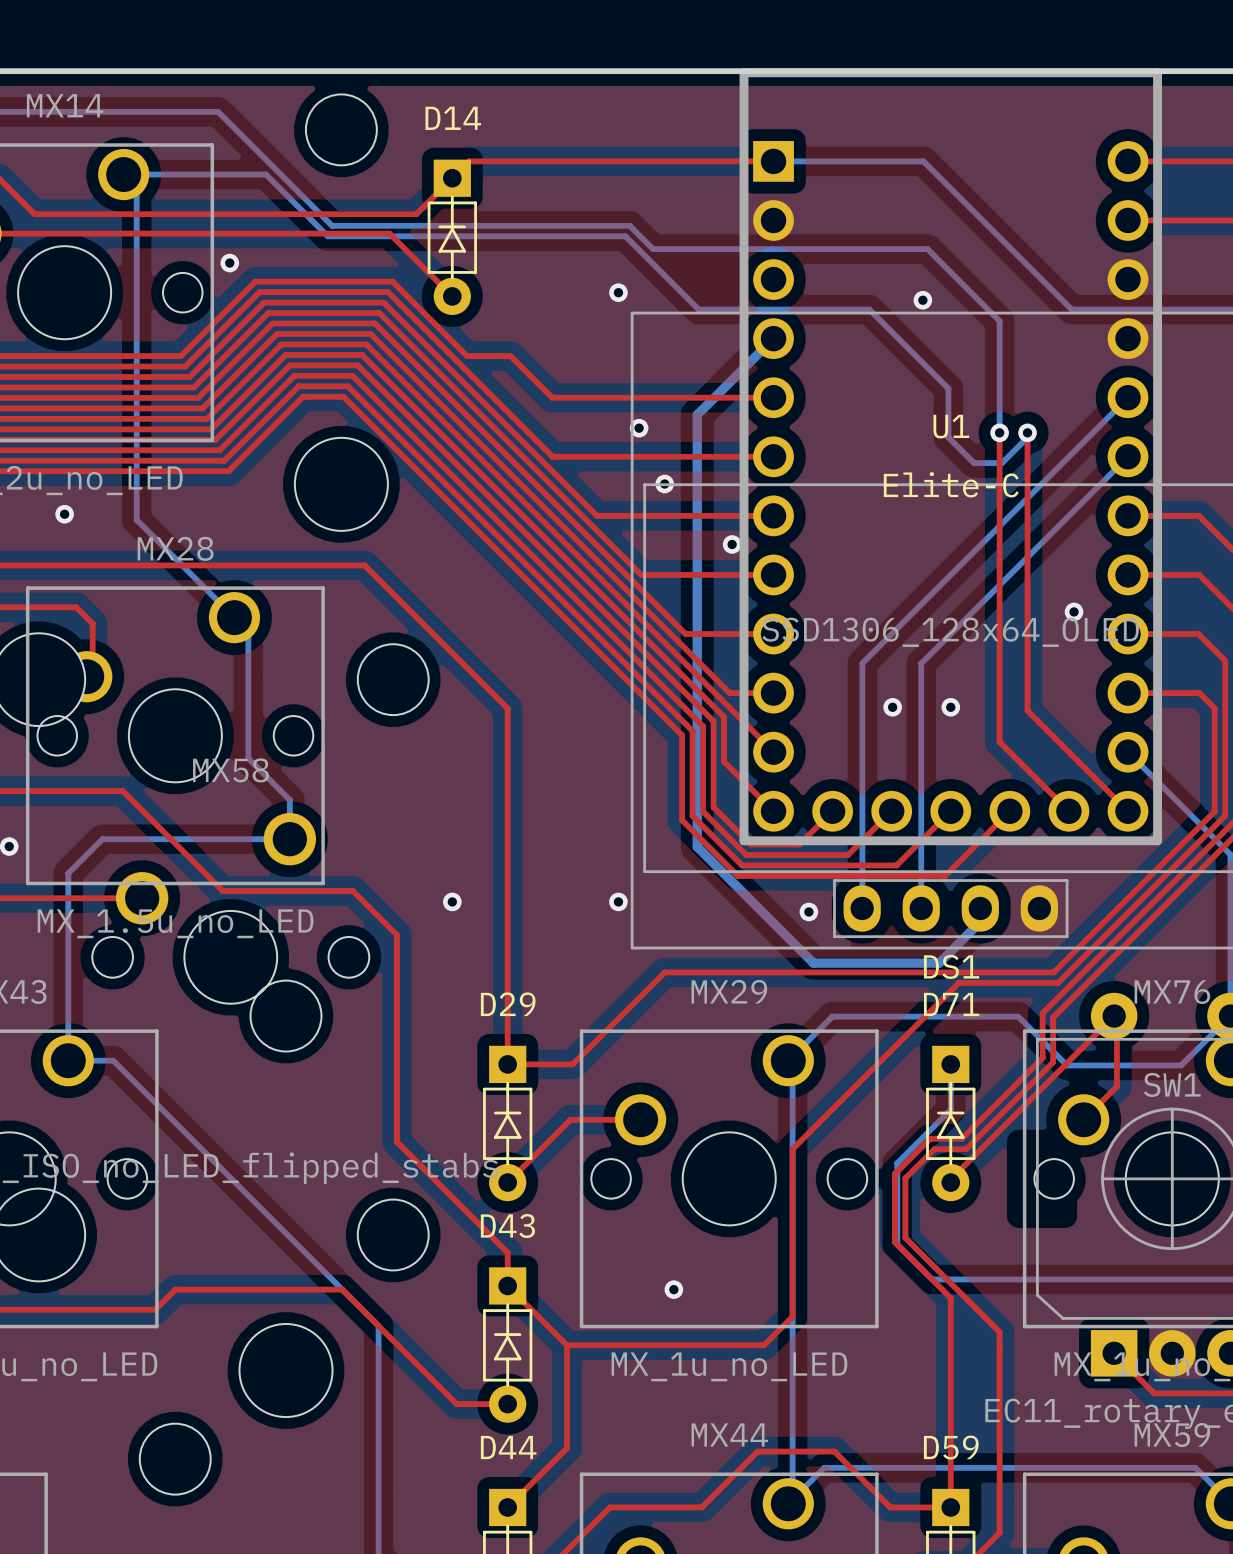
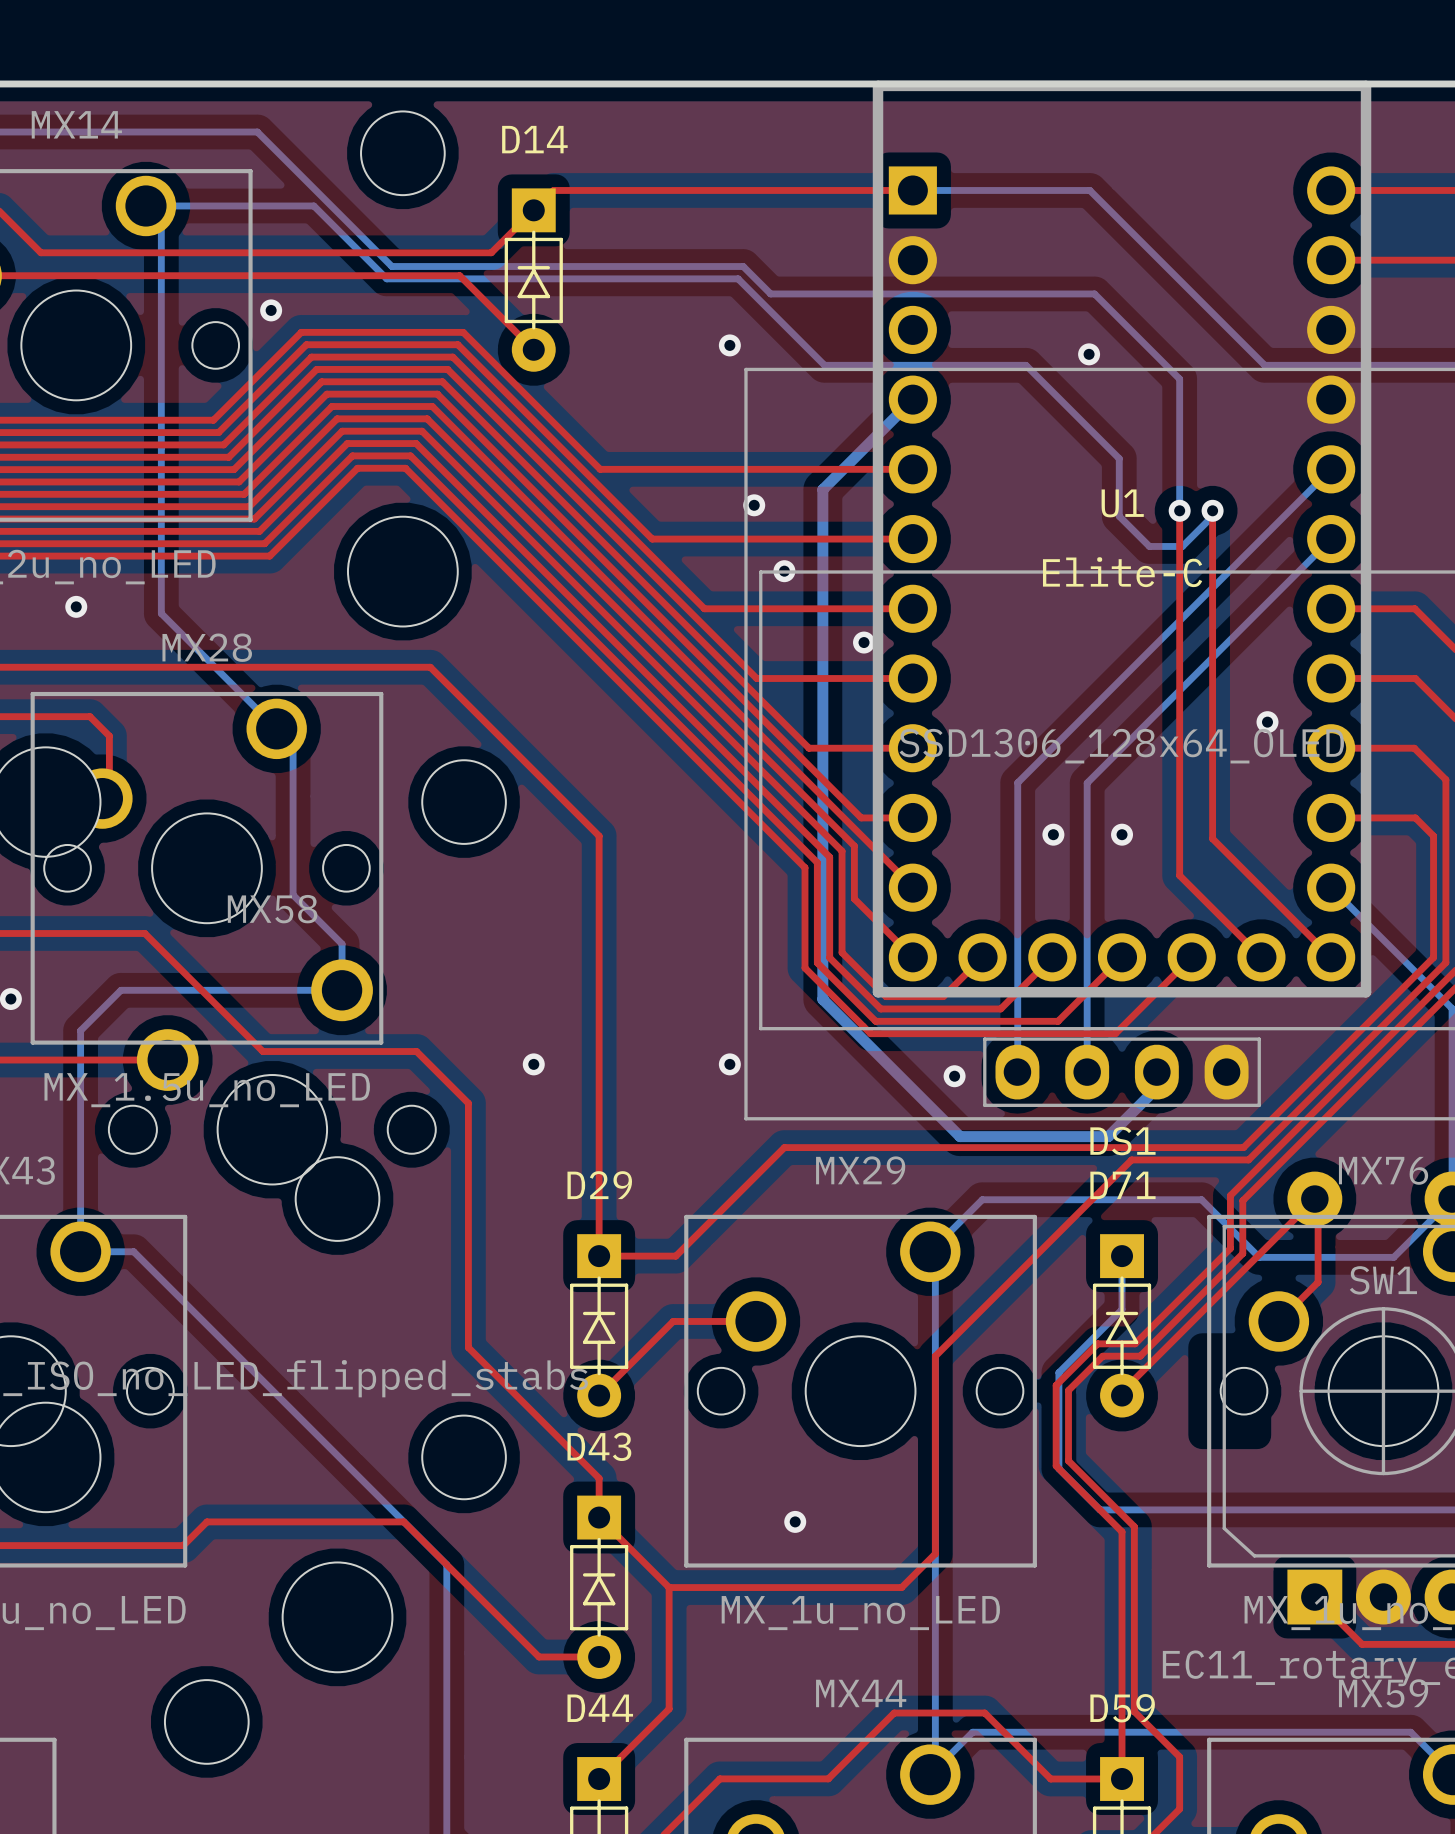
top track: (466, 356) (510, 356) (552, 397) -> (551, 420) (600, 469) (651, 469)
top track: (961, 1293) (999, 1332) (999, 1488) -> (1134, 1526) (1134, 1711) (1179, 1756)

